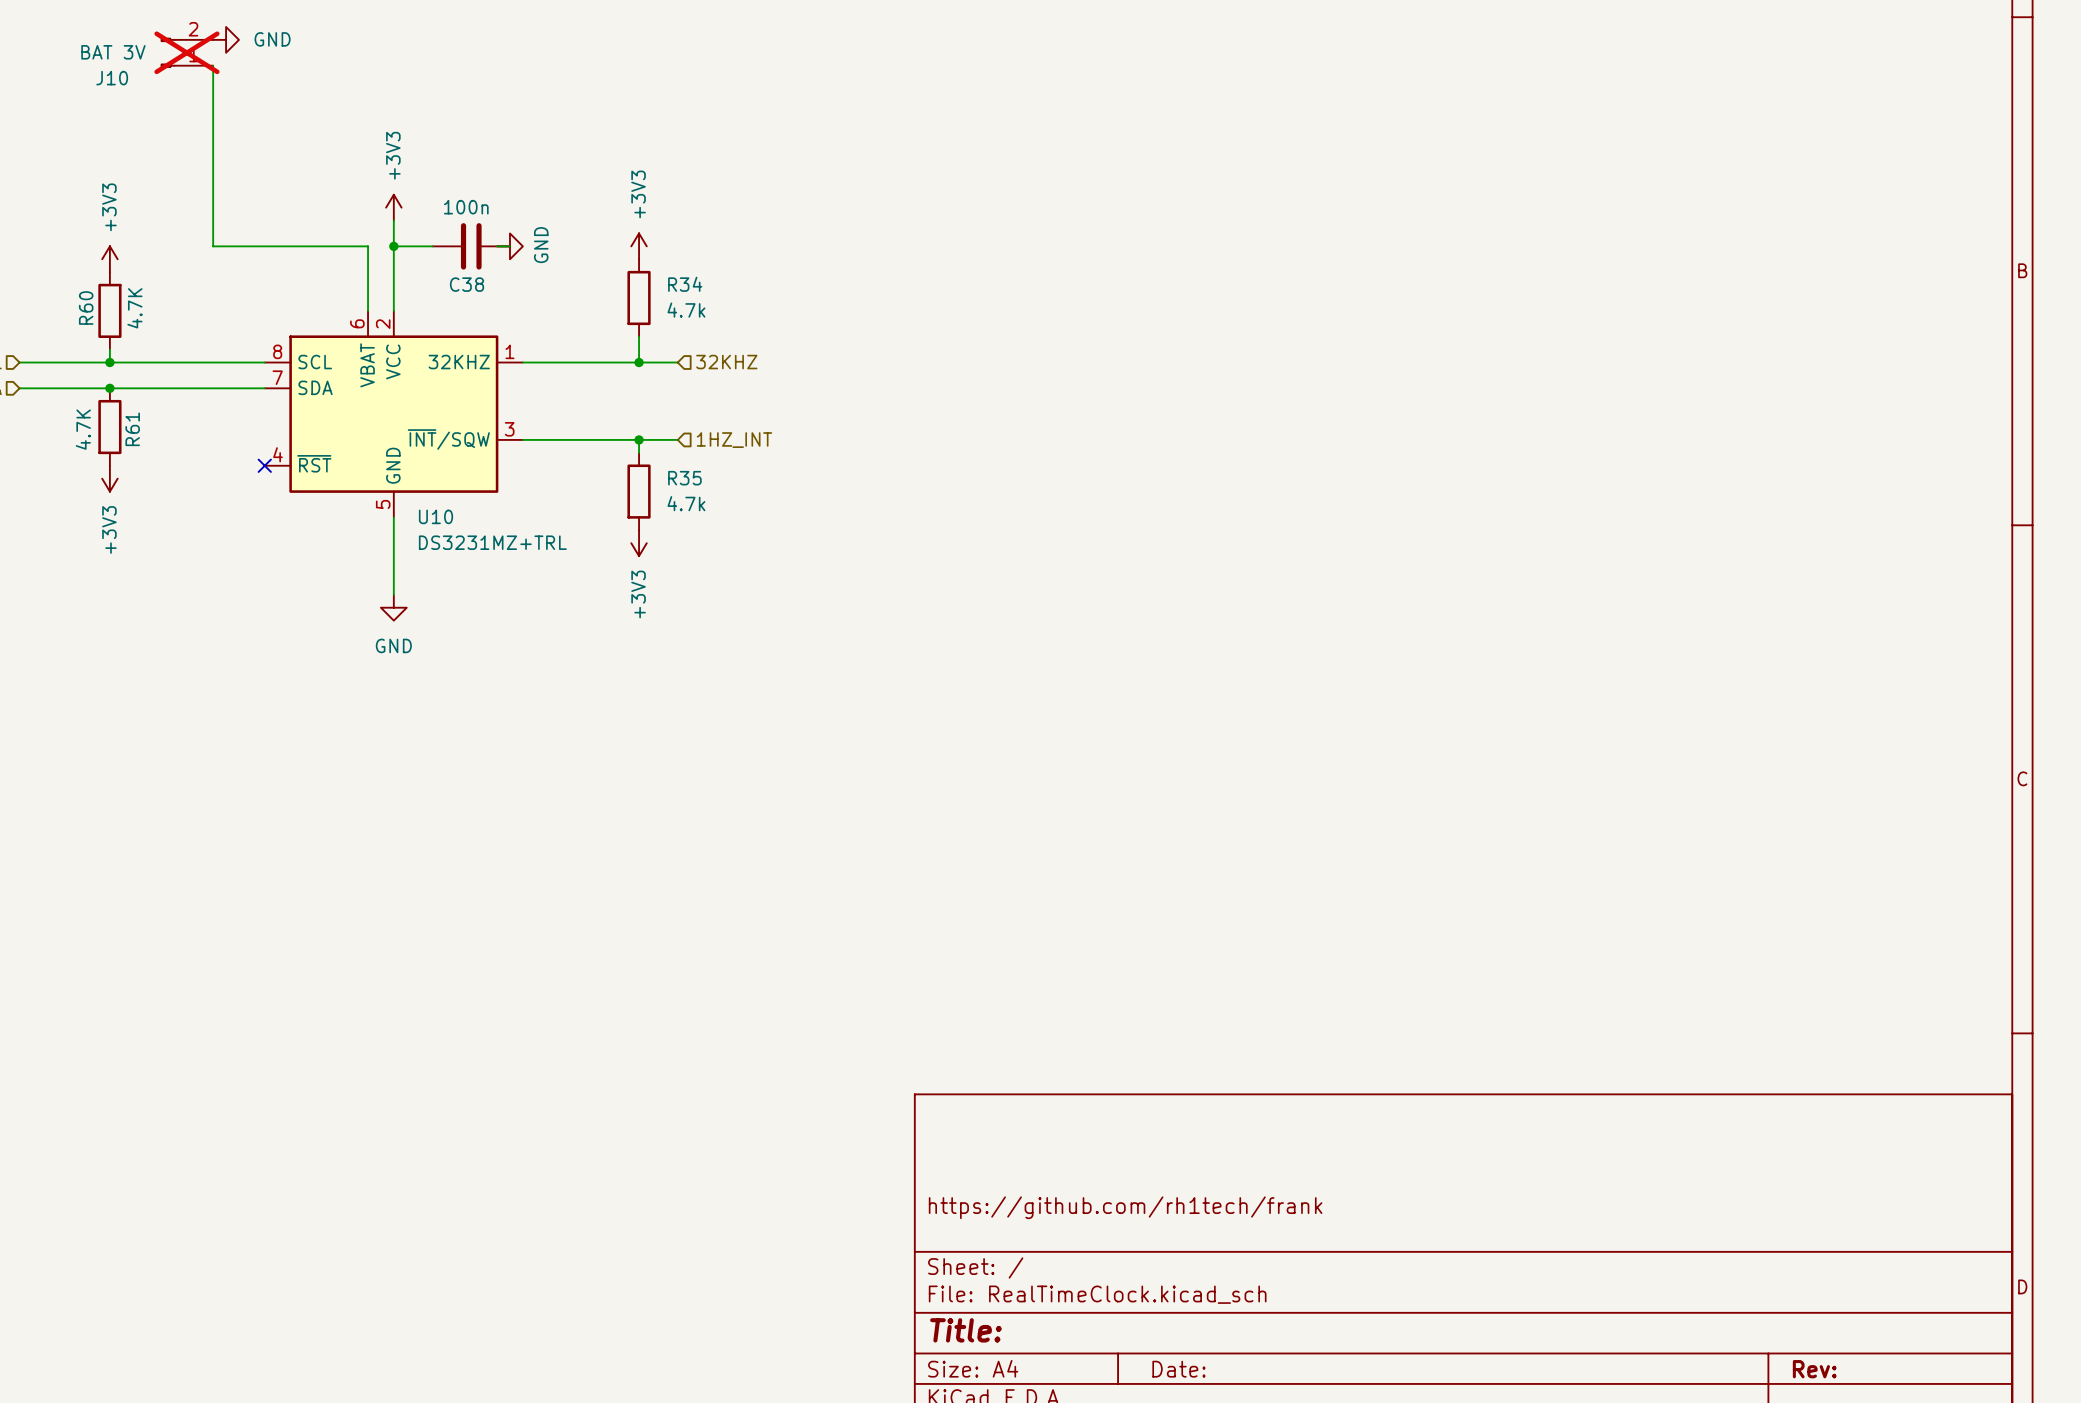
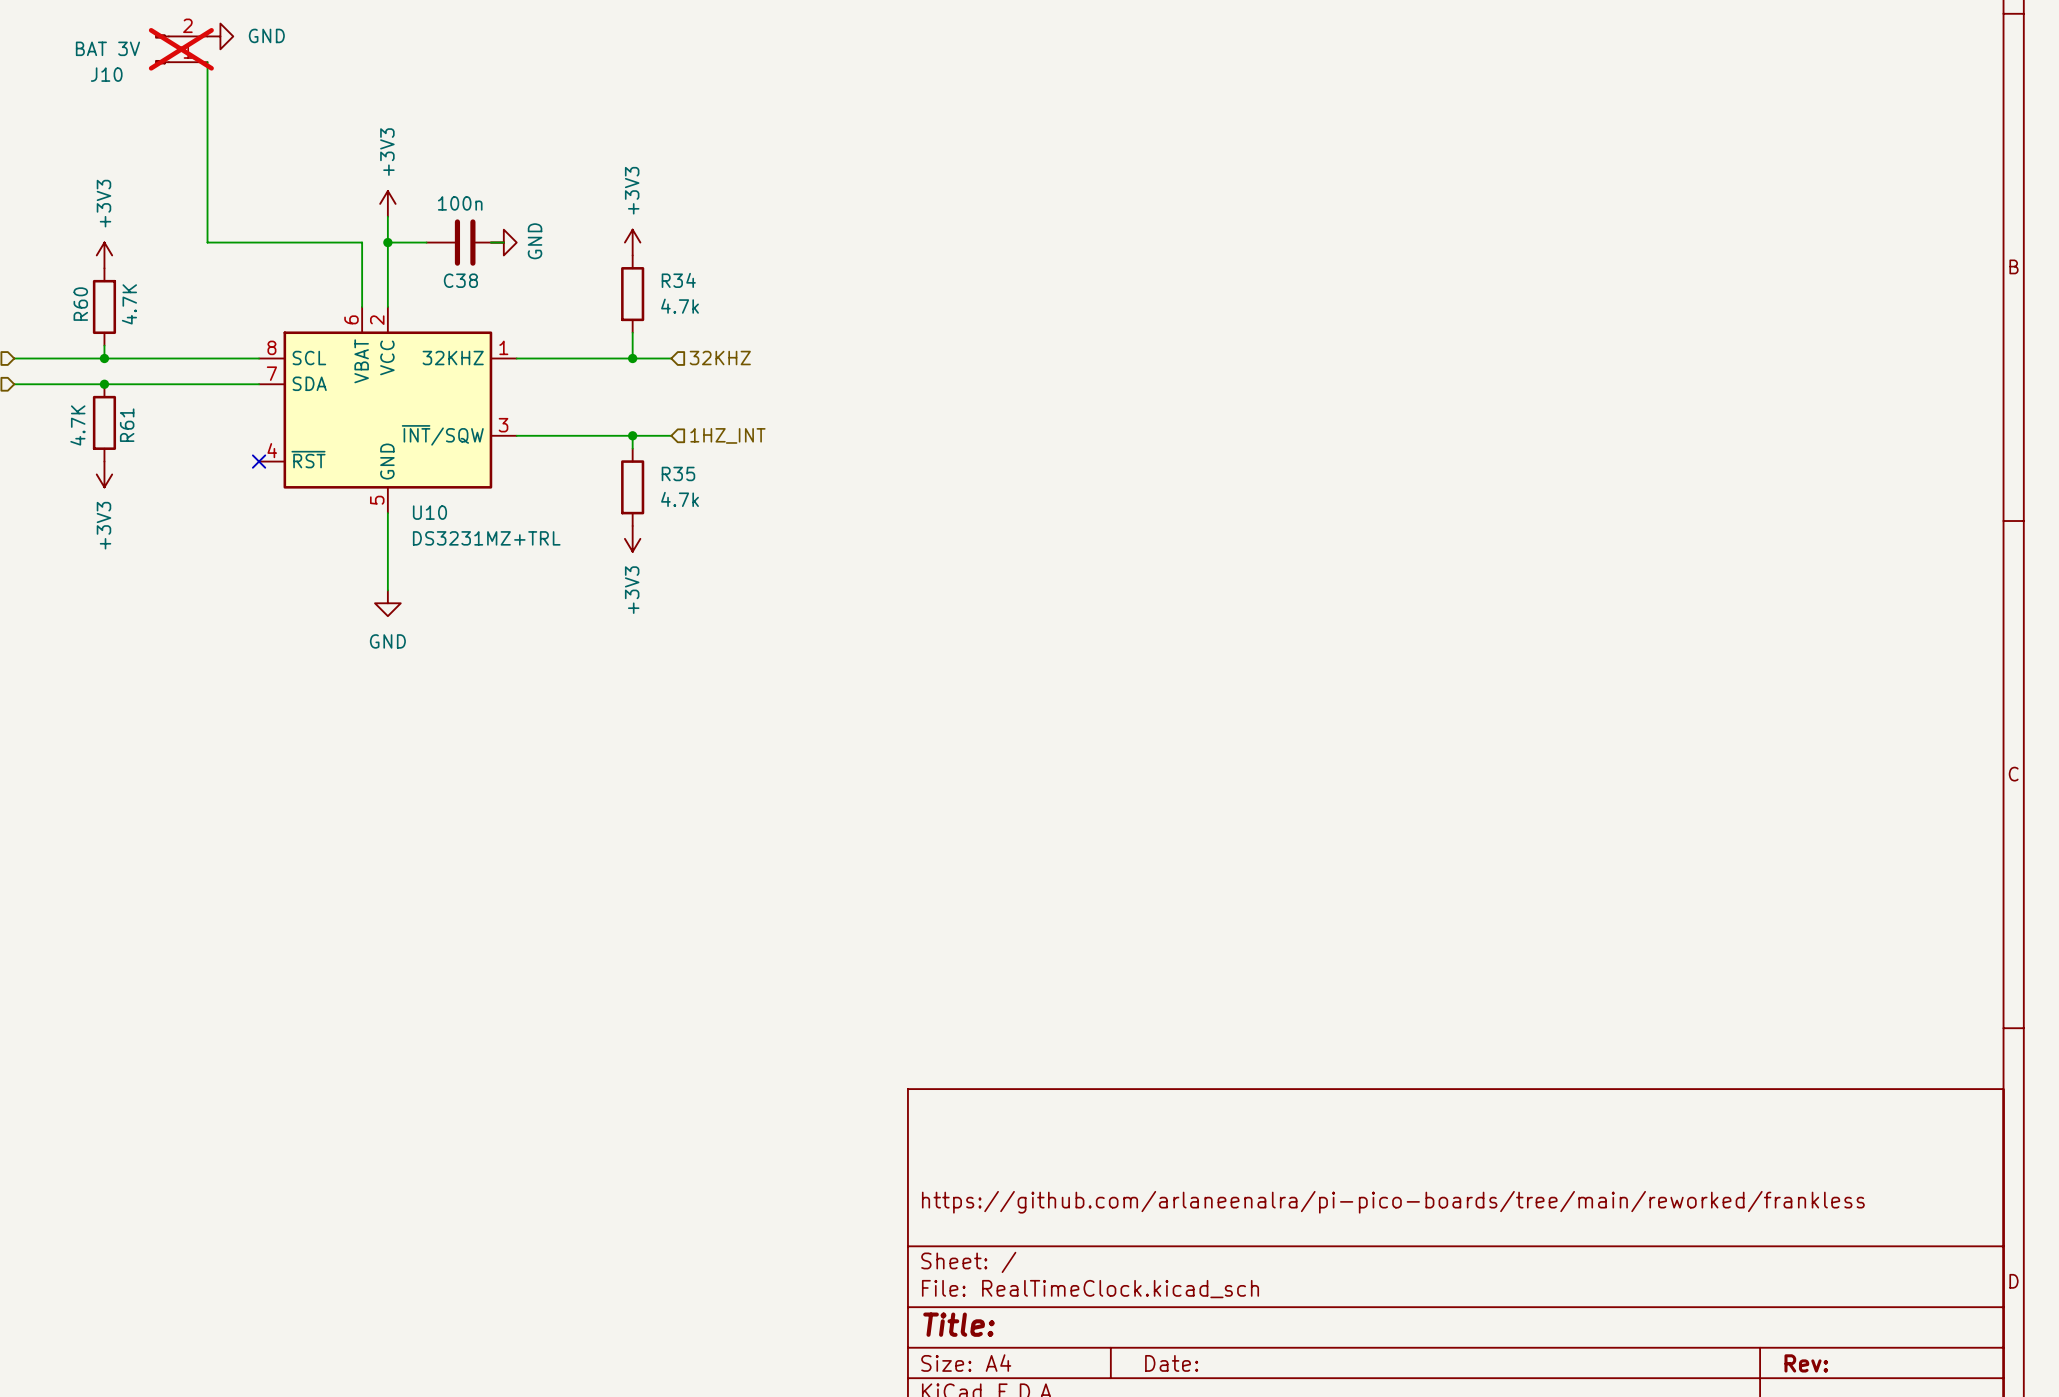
title block: https://github.com/rh1tech/frank (1125, 1207) -> https://github.com/arlaneenalra/pi-pico-boards/tree/main/reworked/frankless (1393, 1202)

